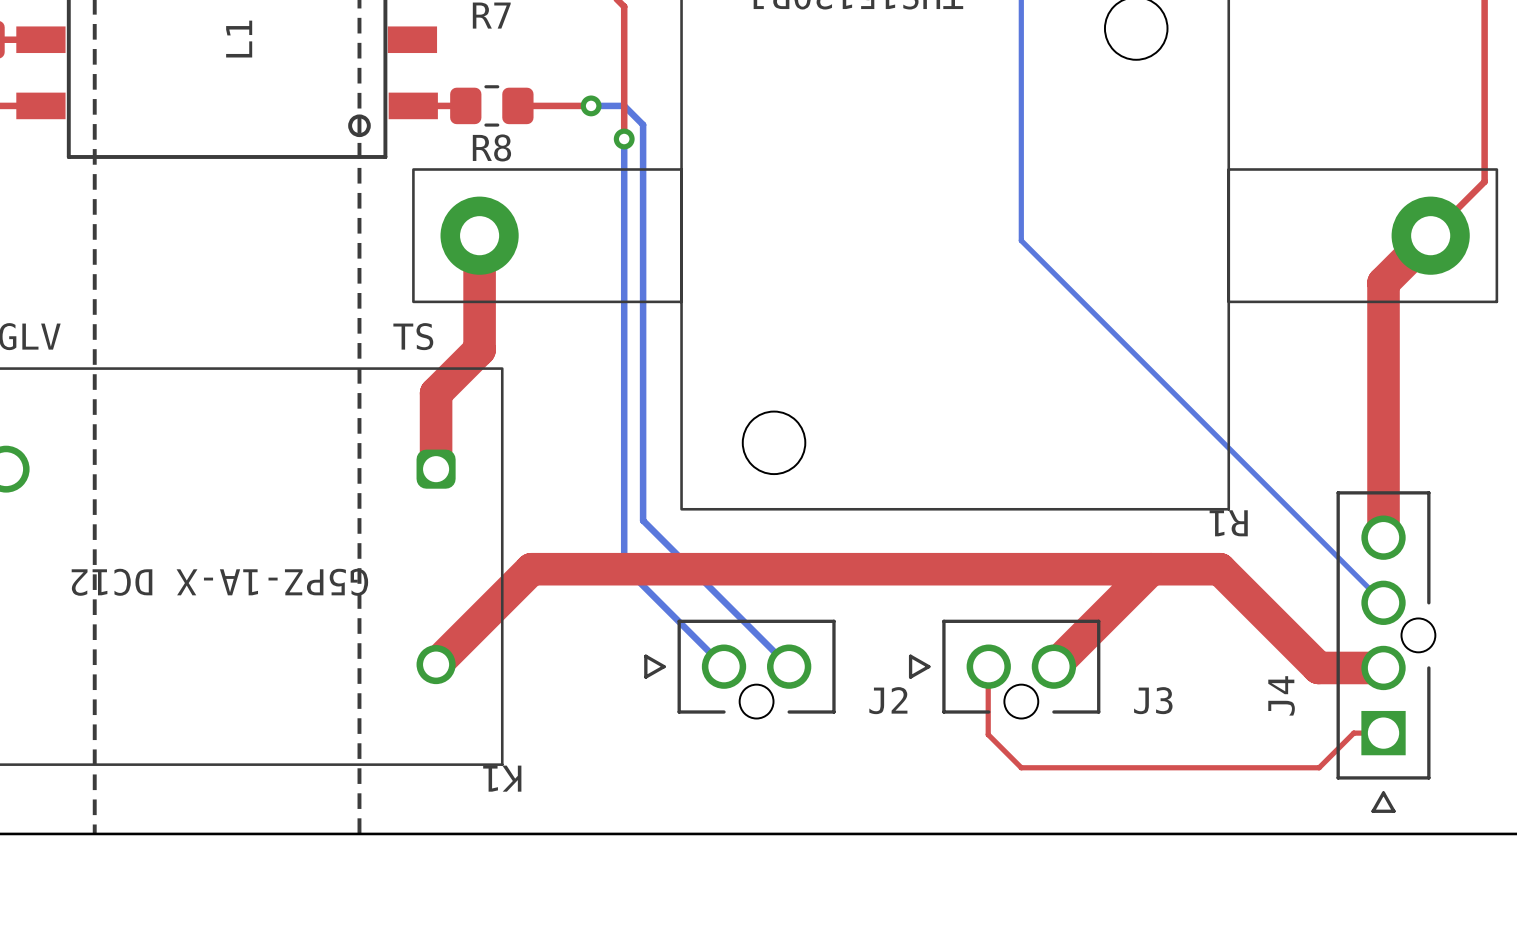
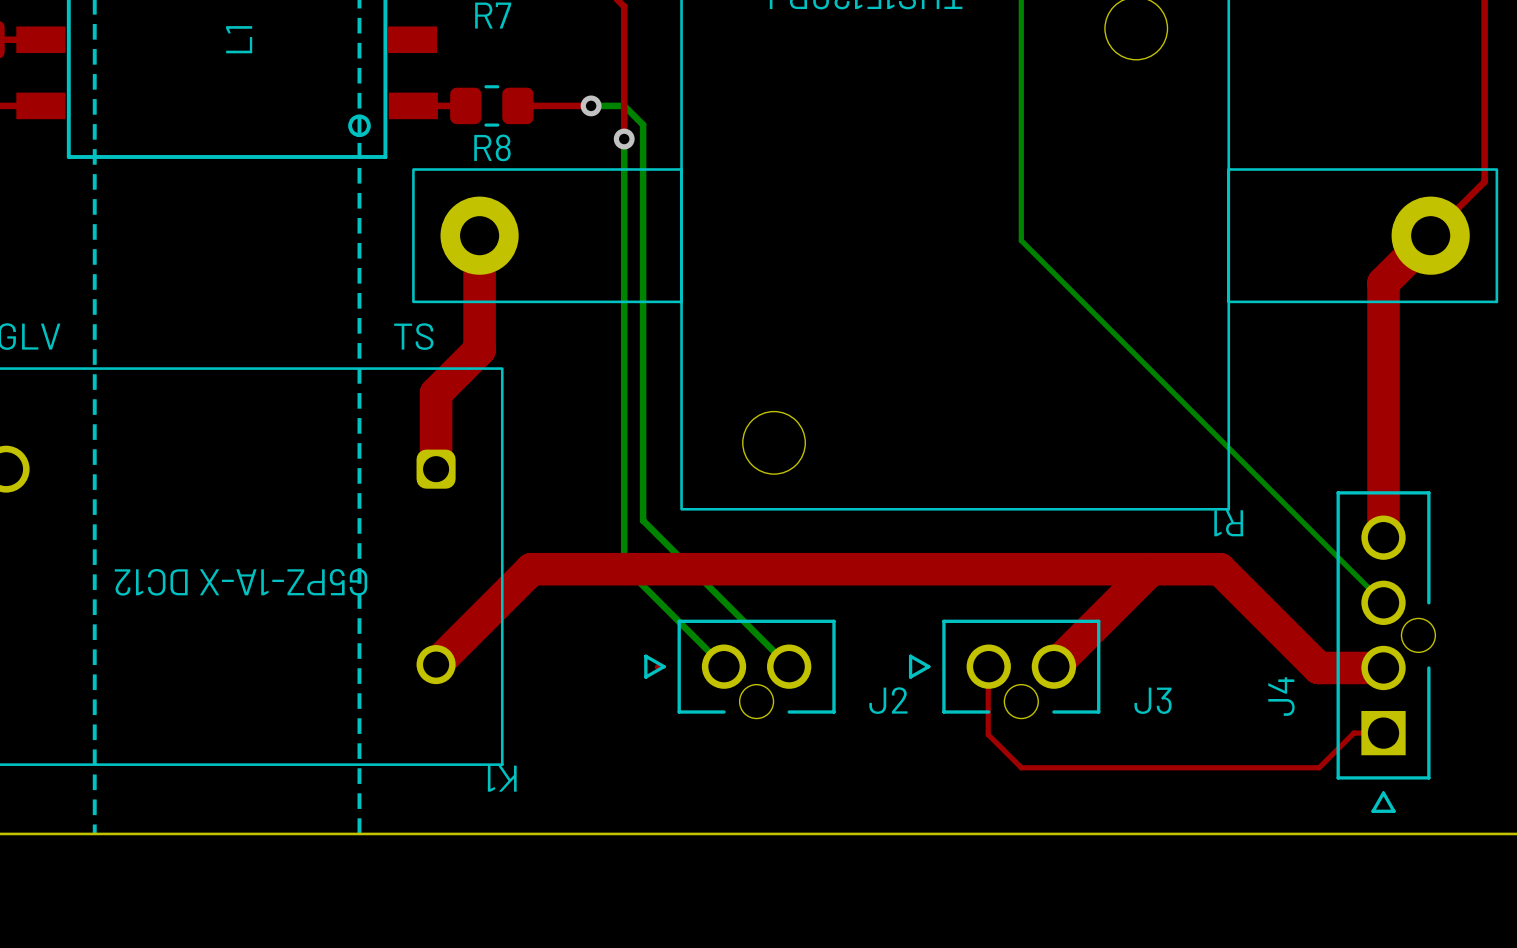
top track: none -> (657, 666) (657, 667)

